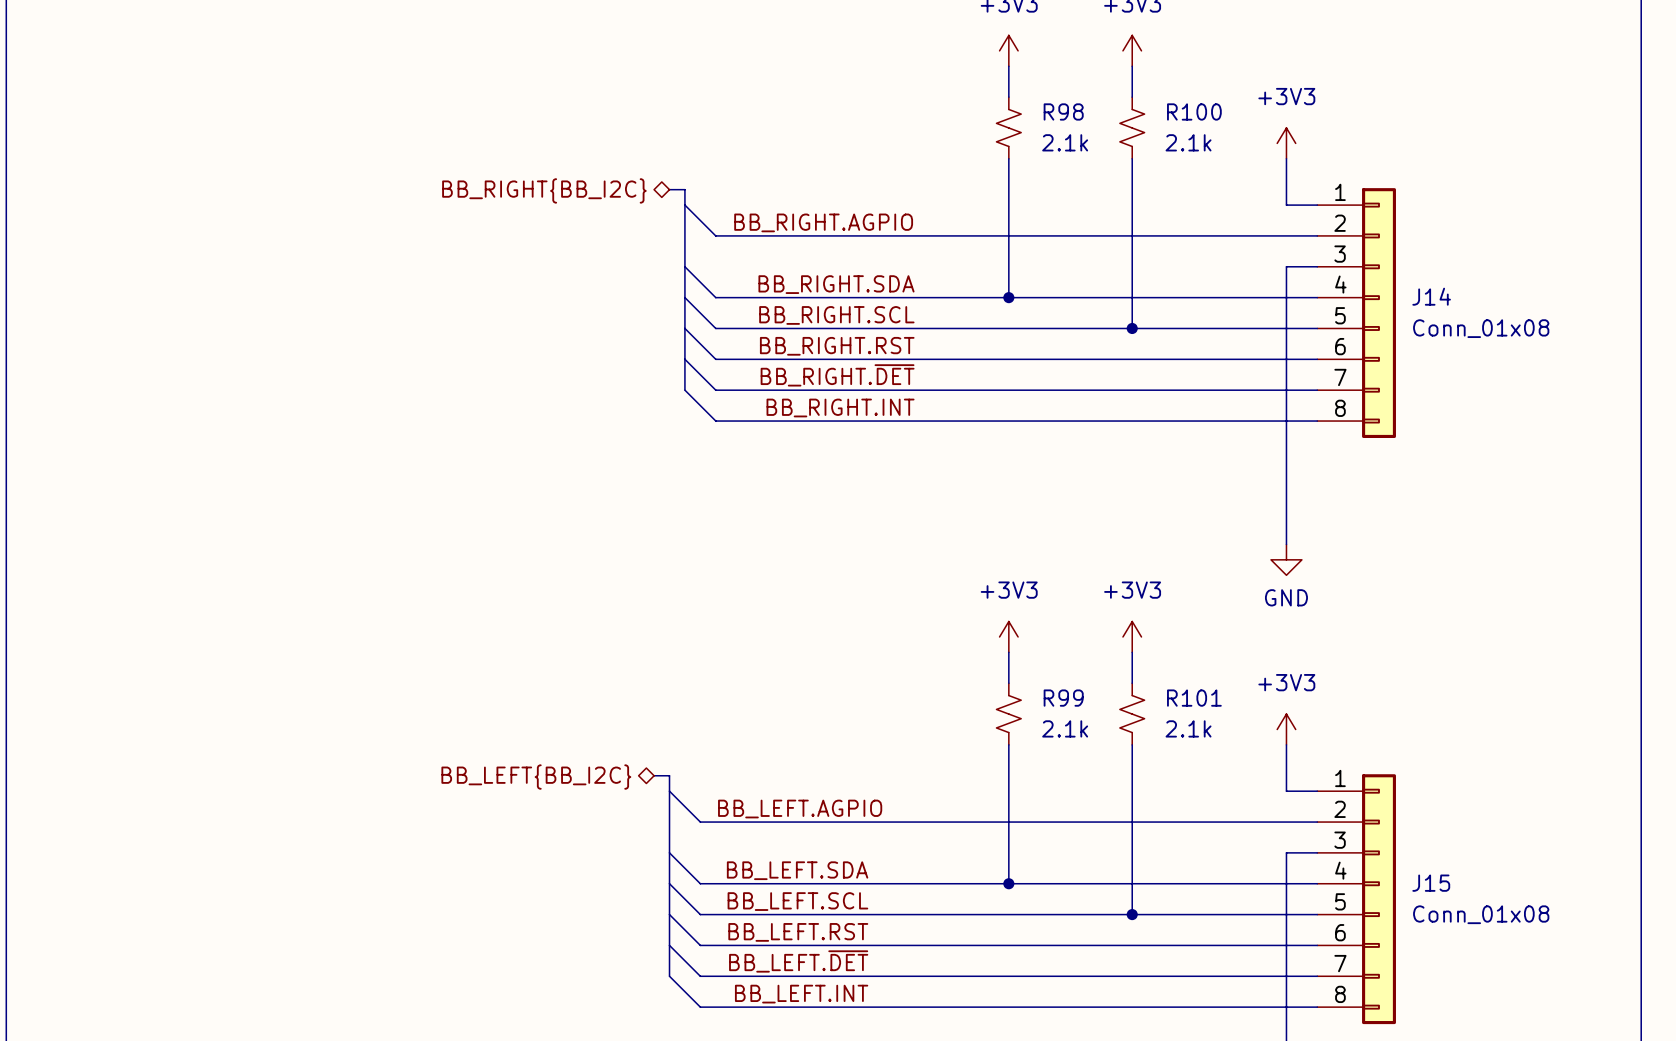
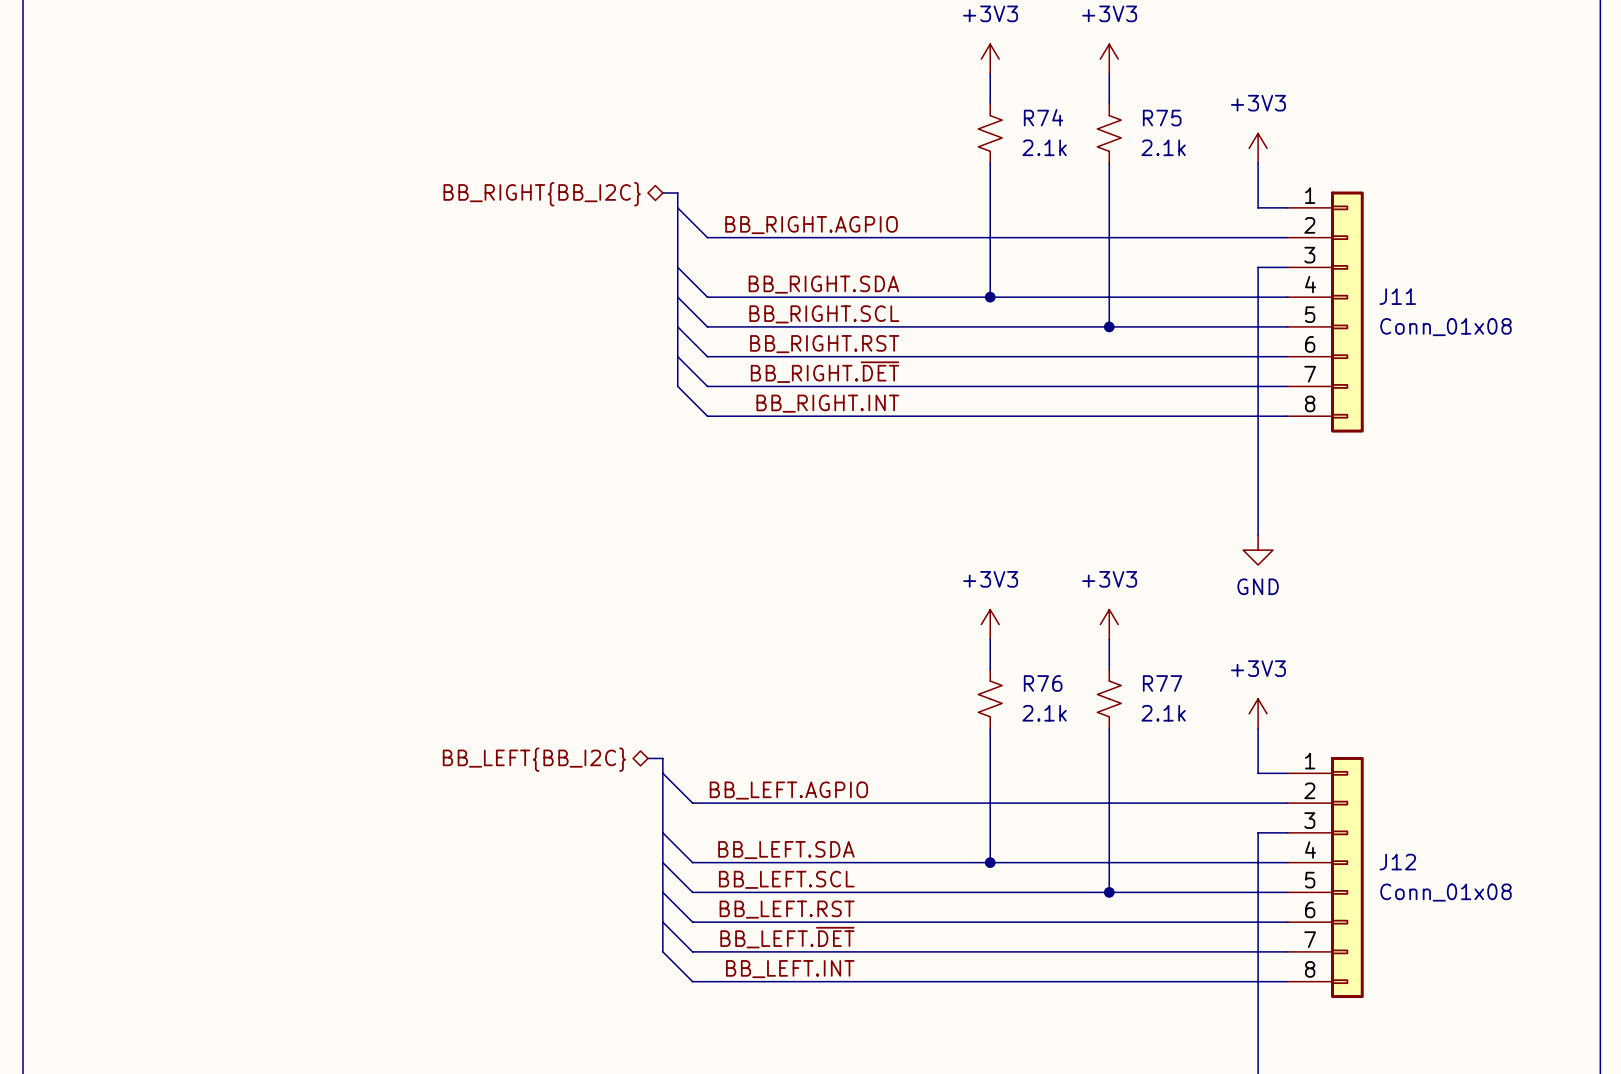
R98 name: R98 (1063, 111) -> R74 (1043, 117)
R100 name: R100 (1194, 111) -> R75 (1162, 118)
J14 name: J14 (1431, 296) -> J11 (1397, 296)
R99 name: R99 (1063, 698) -> R76 (1043, 683)
R101 name: R101 (1194, 698) -> R77 (1162, 683)
J15 name: J15 (1431, 883) -> J12 (1397, 862)

